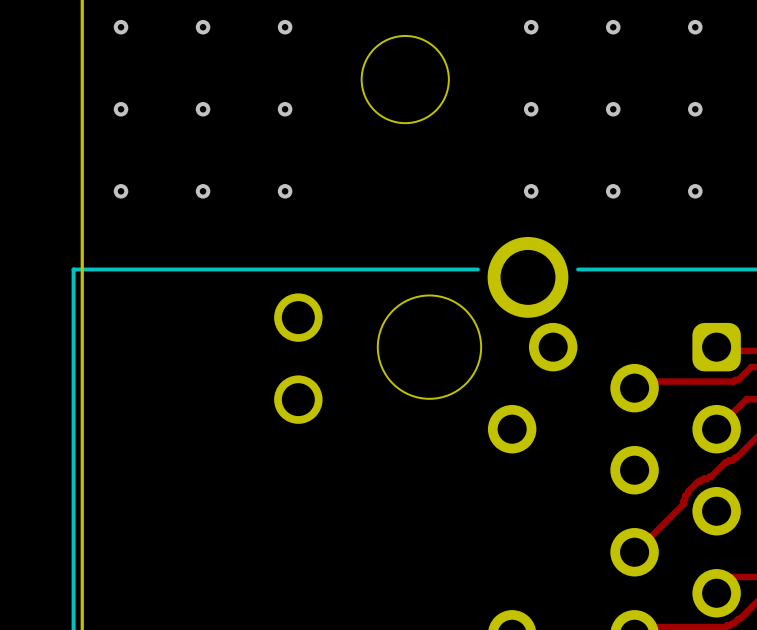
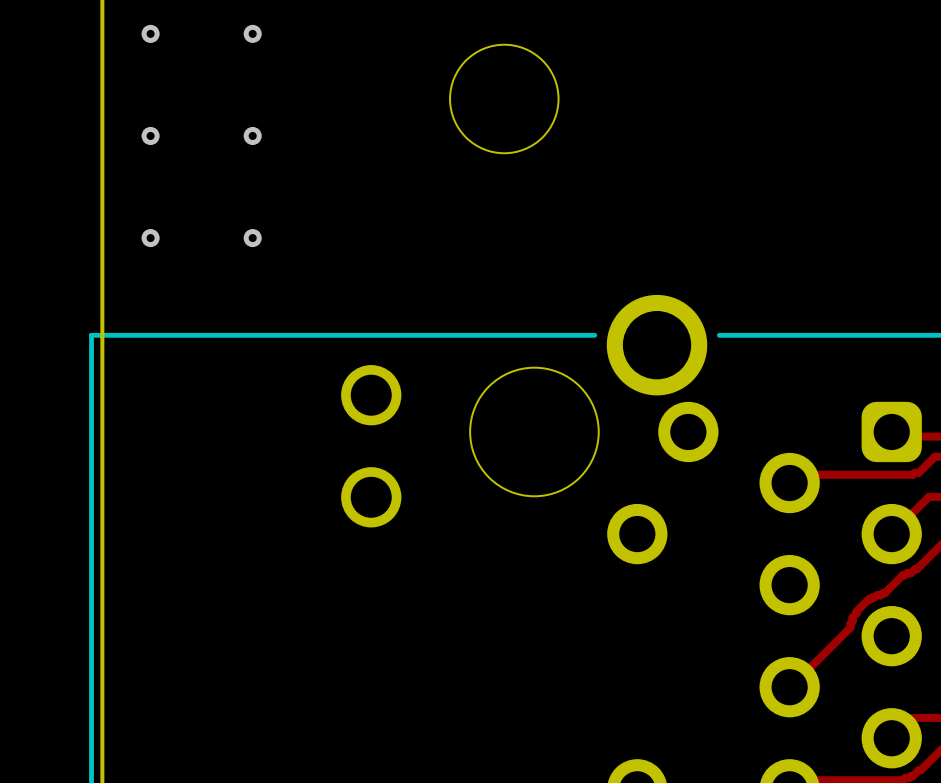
via: (285, 27) -> none
via: (531, 27) -> none
via: (613, 27) -> none
via: (695, 27) -> none
via: (285, 109) -> none
via: (531, 109) -> none
via: (613, 109) -> none
via: (695, 109) -> none
via: (285, 191) -> none
via: (531, 191) -> none
via: (613, 191) -> none
via: (695, 191) -> none

